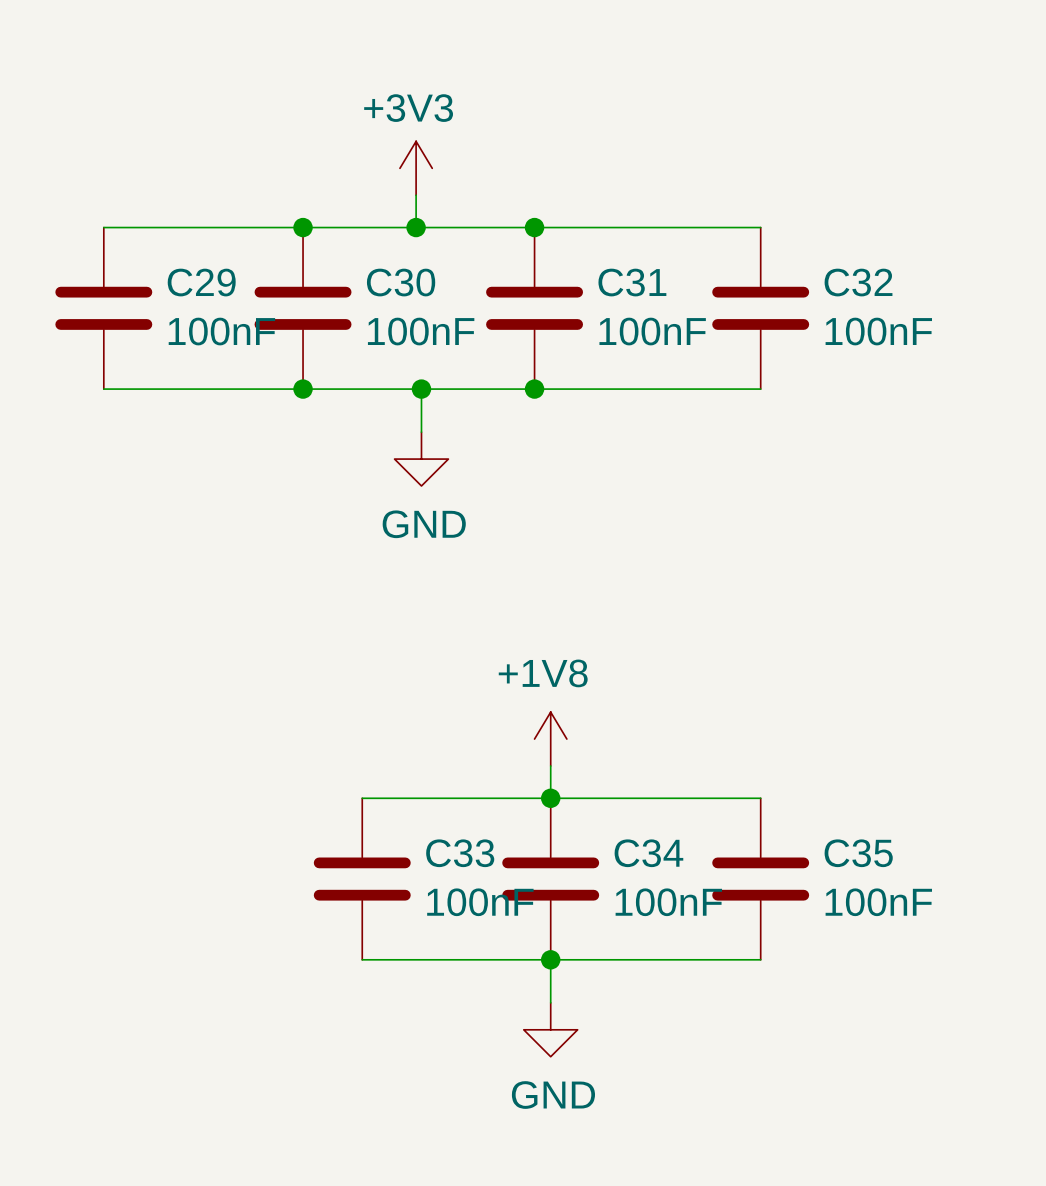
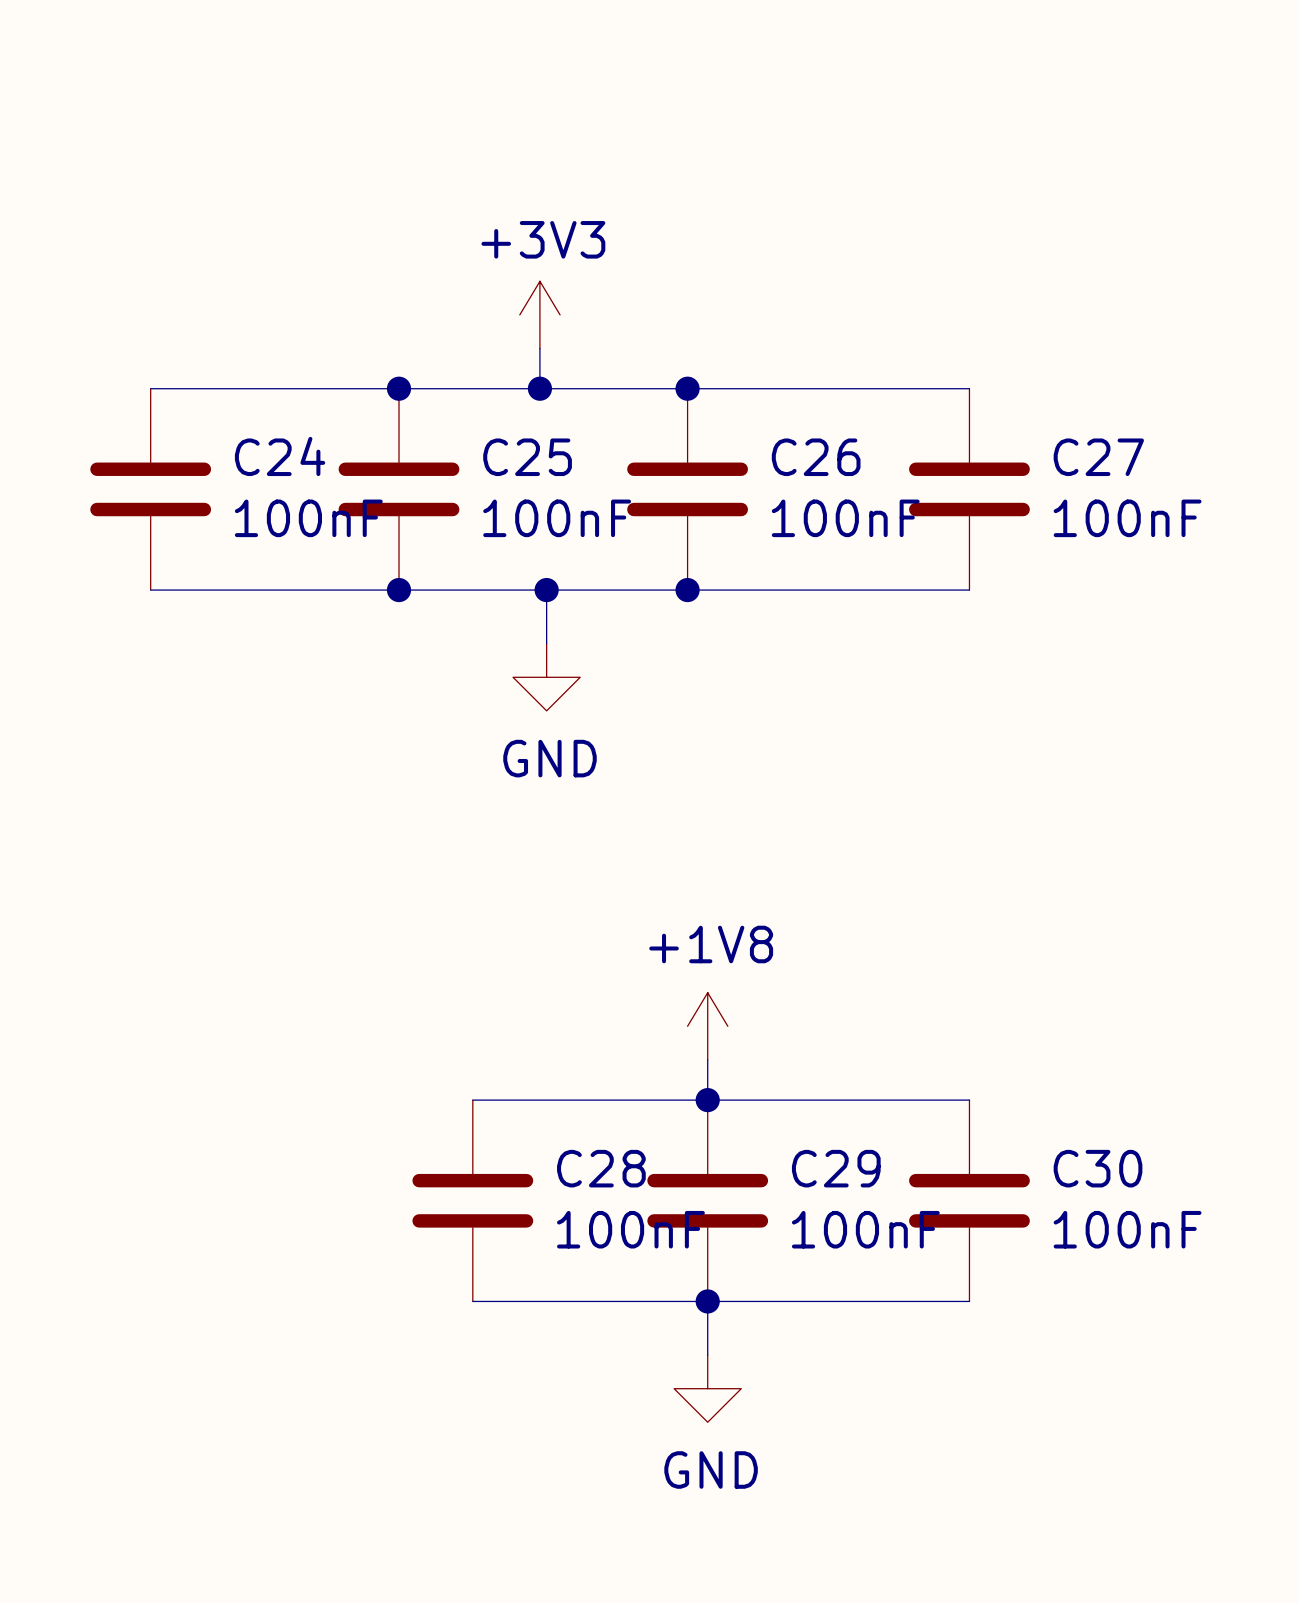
C29 name: C29 (201, 282) -> C24 (280, 456)
C30 name: C30 (401, 282) -> C25 (527, 457)
C31 name: C31 (632, 282) -> C26 (816, 457)
C32 name: C32 (858, 282) -> C27 (1098, 457)
C33 name: C33 (460, 853) -> C28 (601, 1168)
C34 name: C34 (648, 853) -> C29 (836, 1168)
C35 name: C35 (858, 853) -> C30 (1098, 1168)

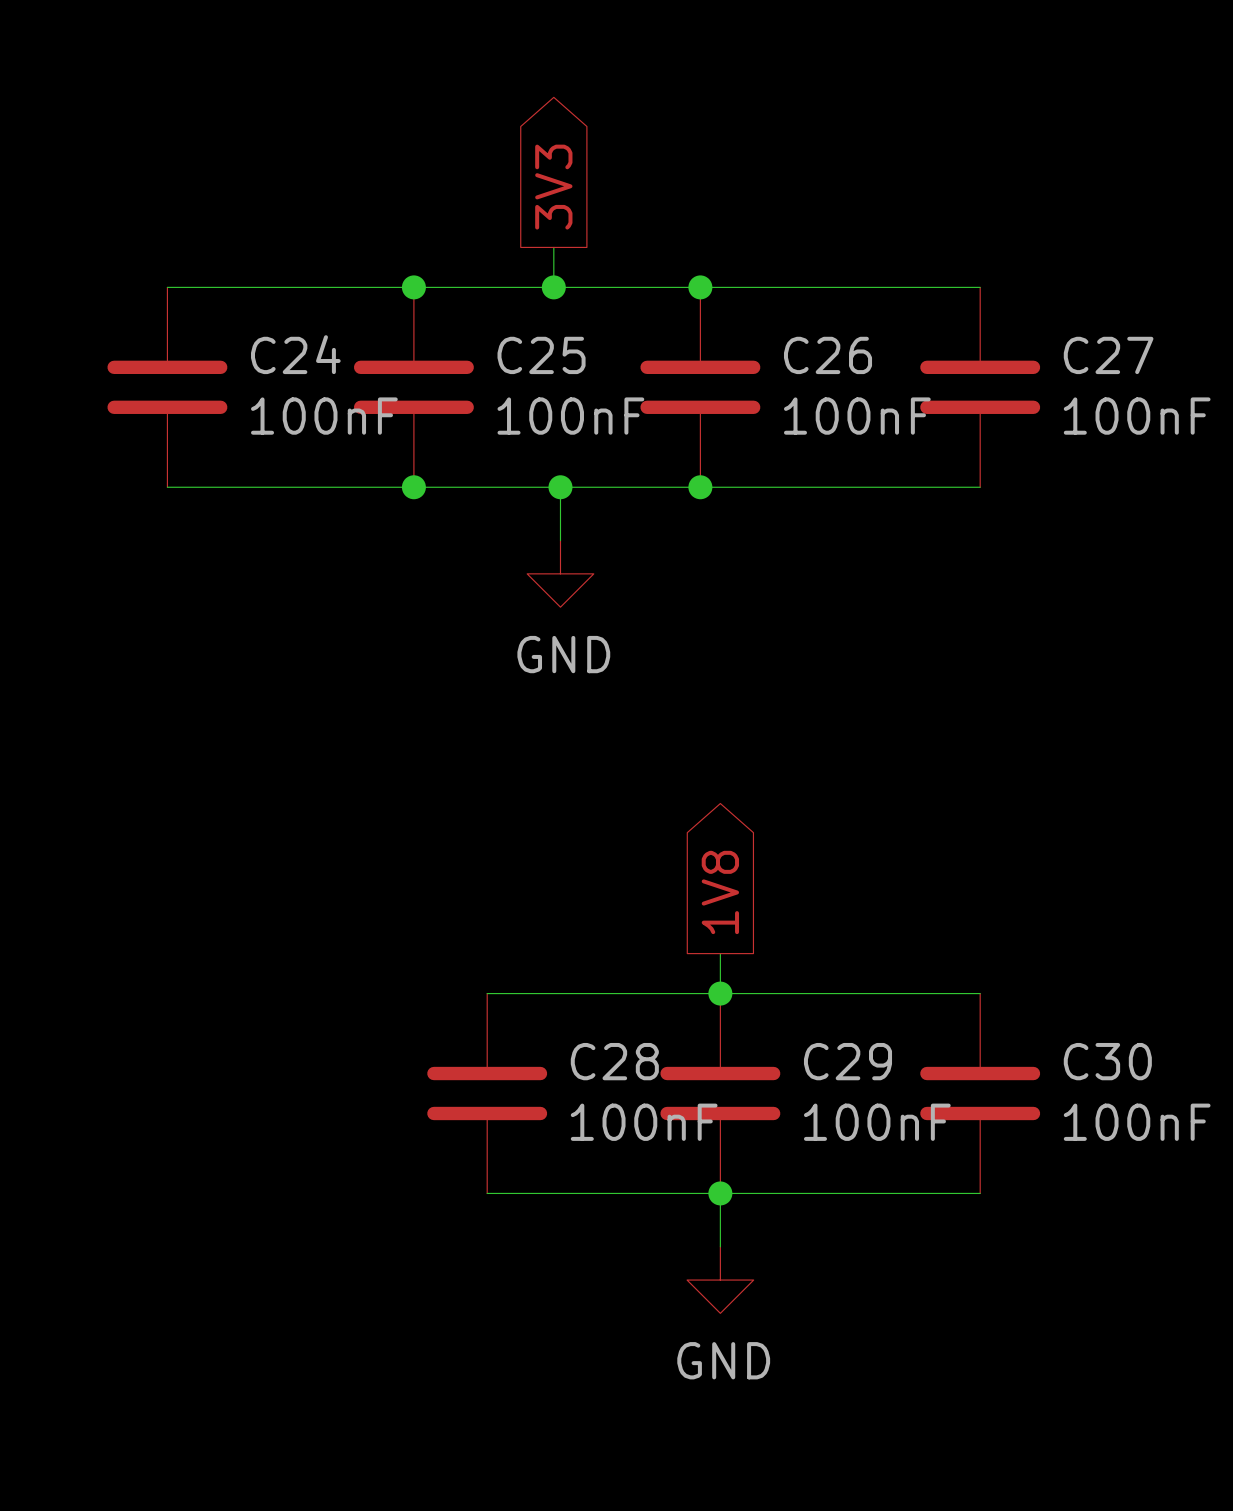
global label: none -> 3V3 (553, 187)
power symbol: +3V3 (539, 314) -> none
global label: none -> 1V8 (720, 892)
power symbol: +1V8 (707, 1026) -> none

